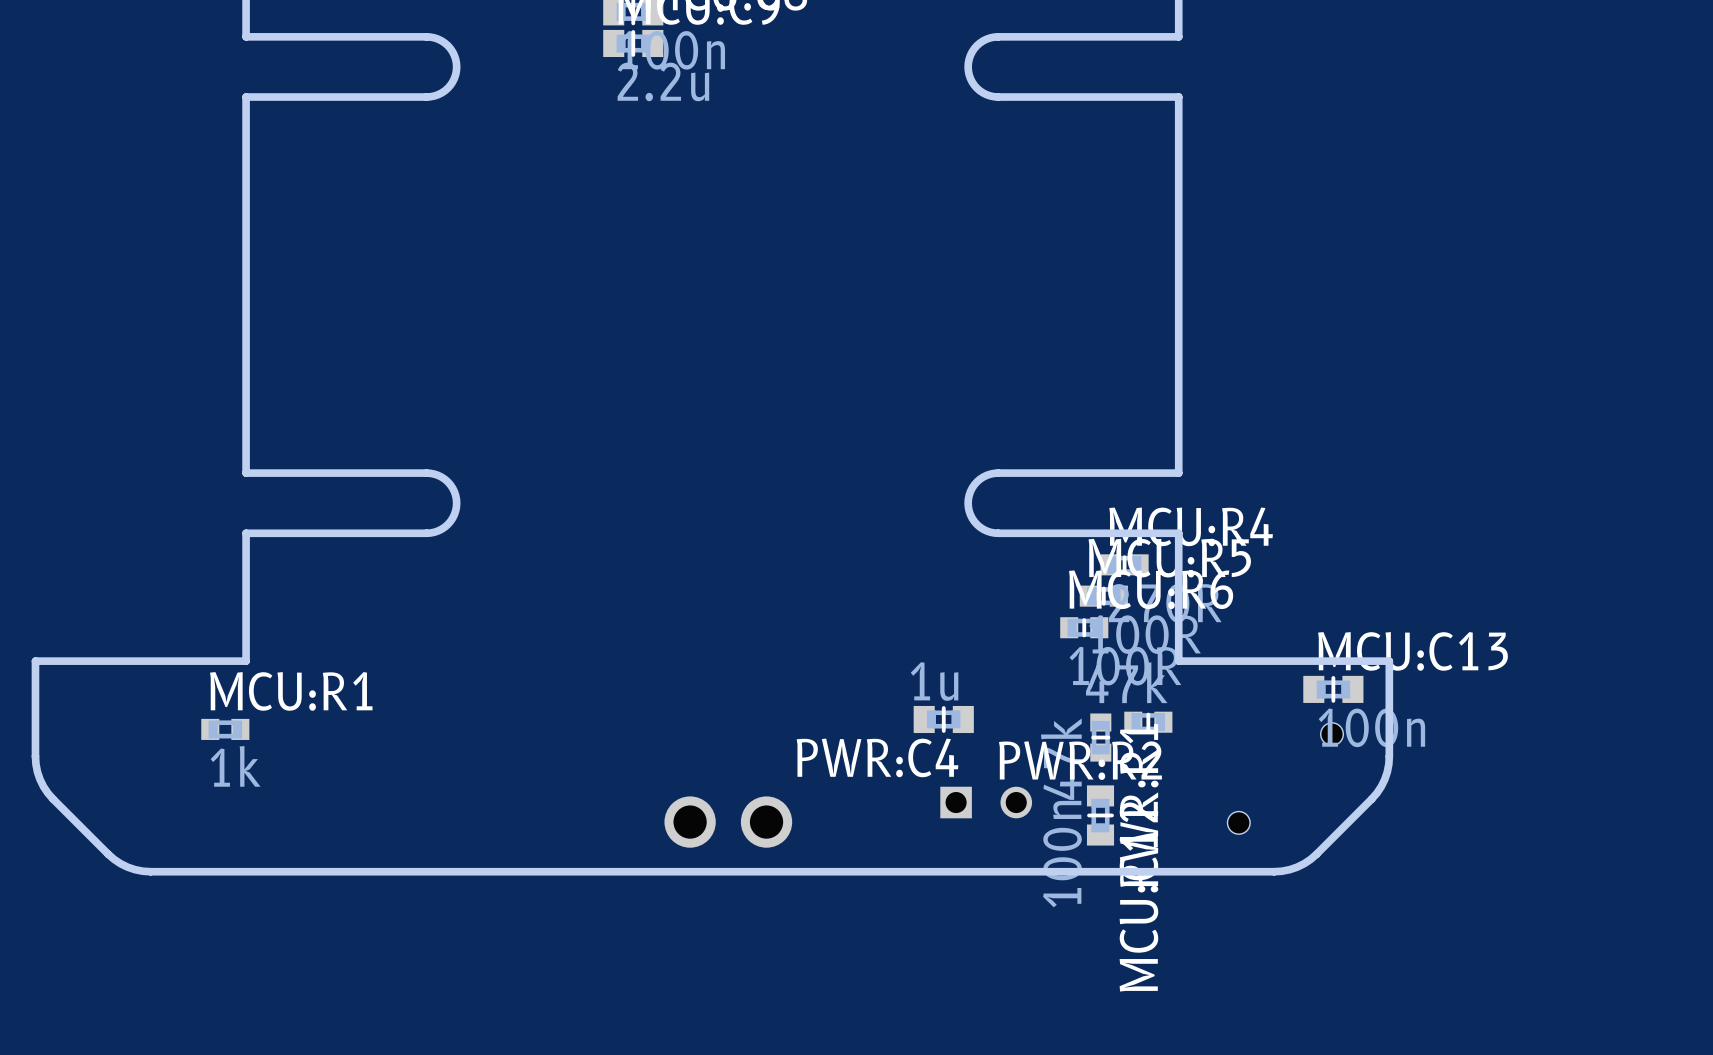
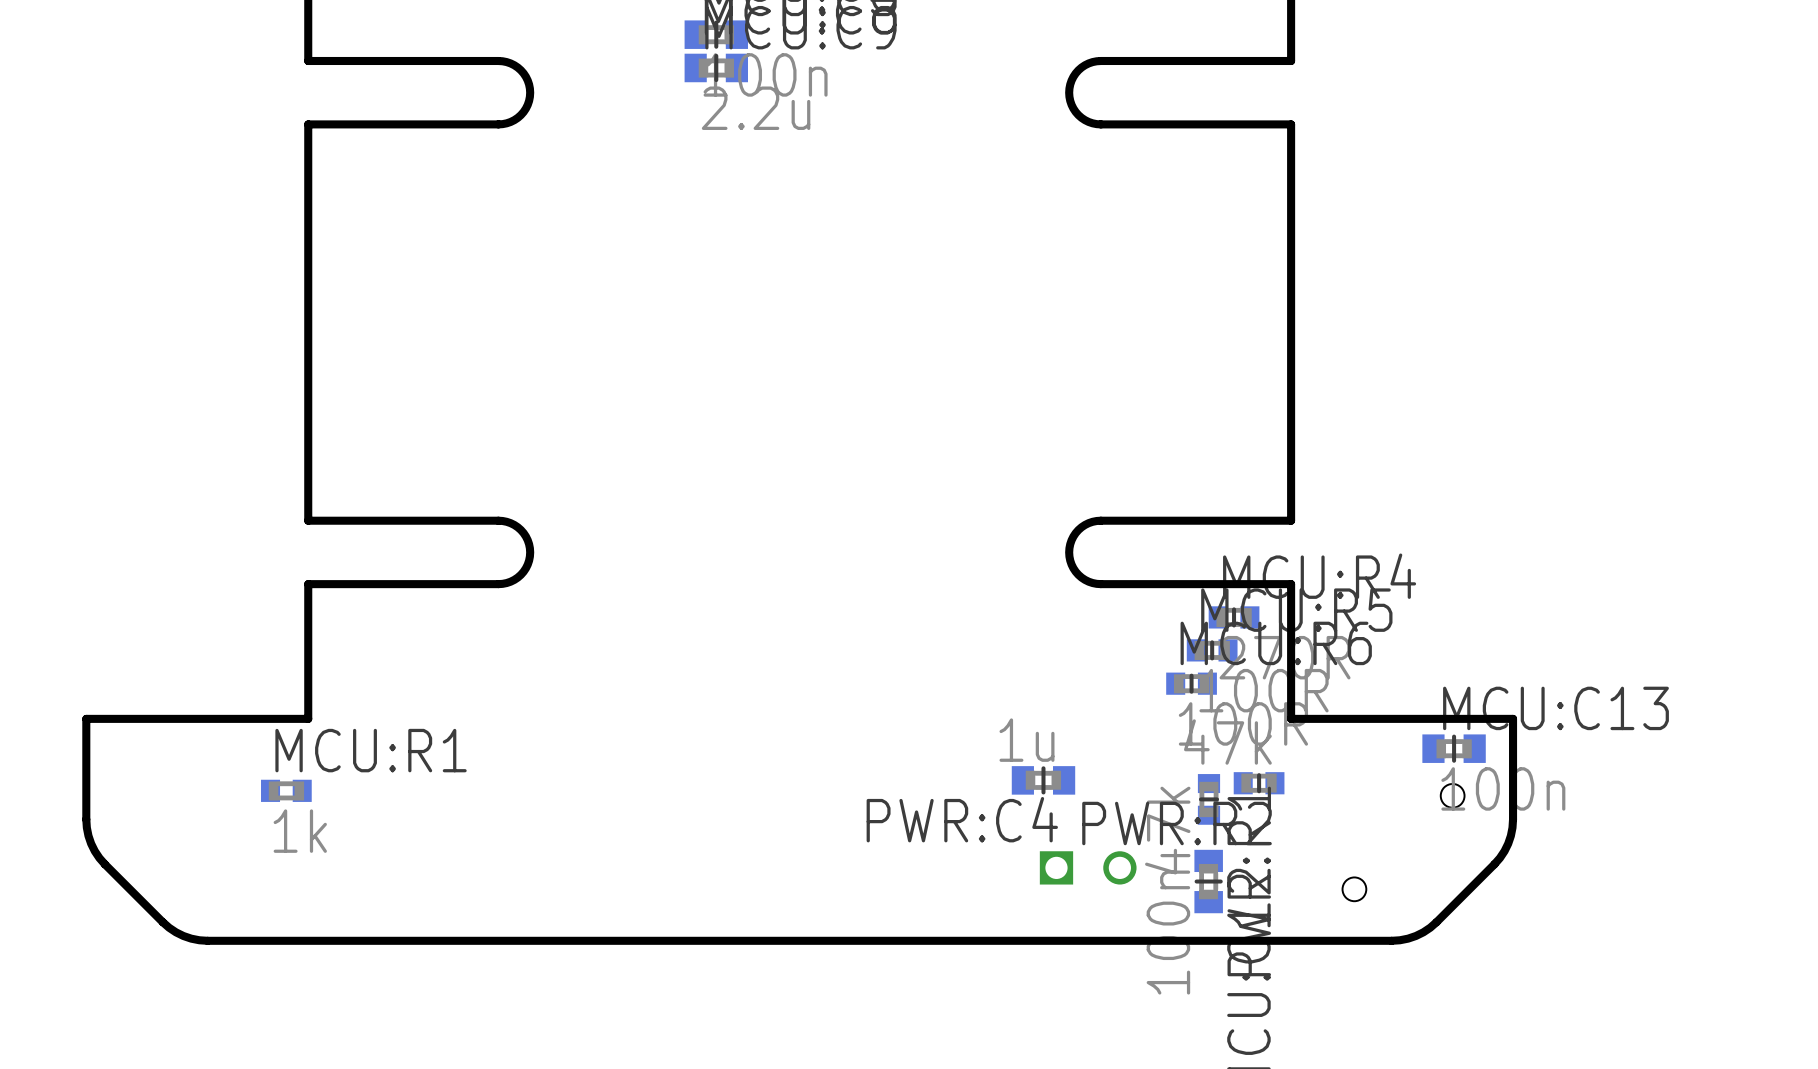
part: (690, 822) -> none
part: (766, 822) -> none

